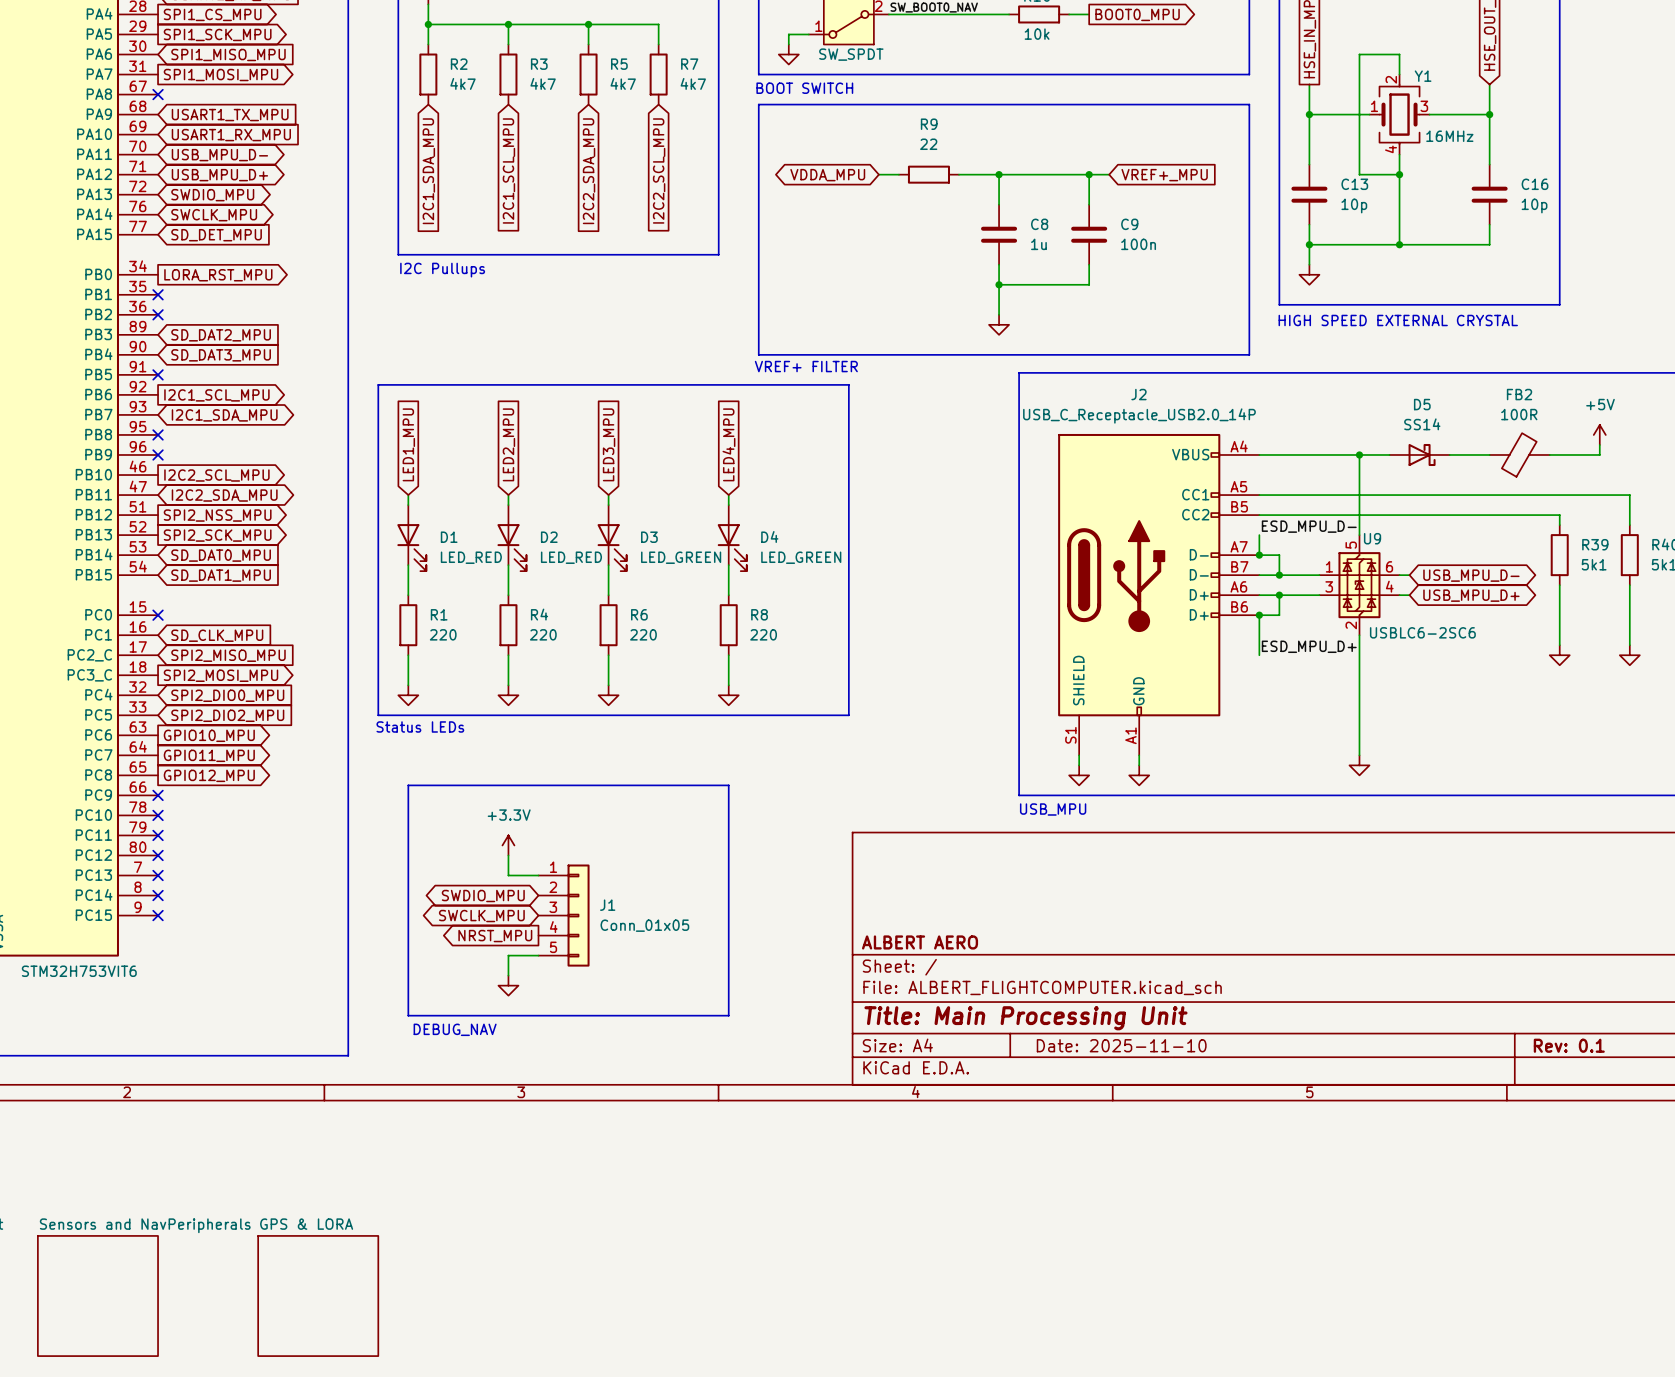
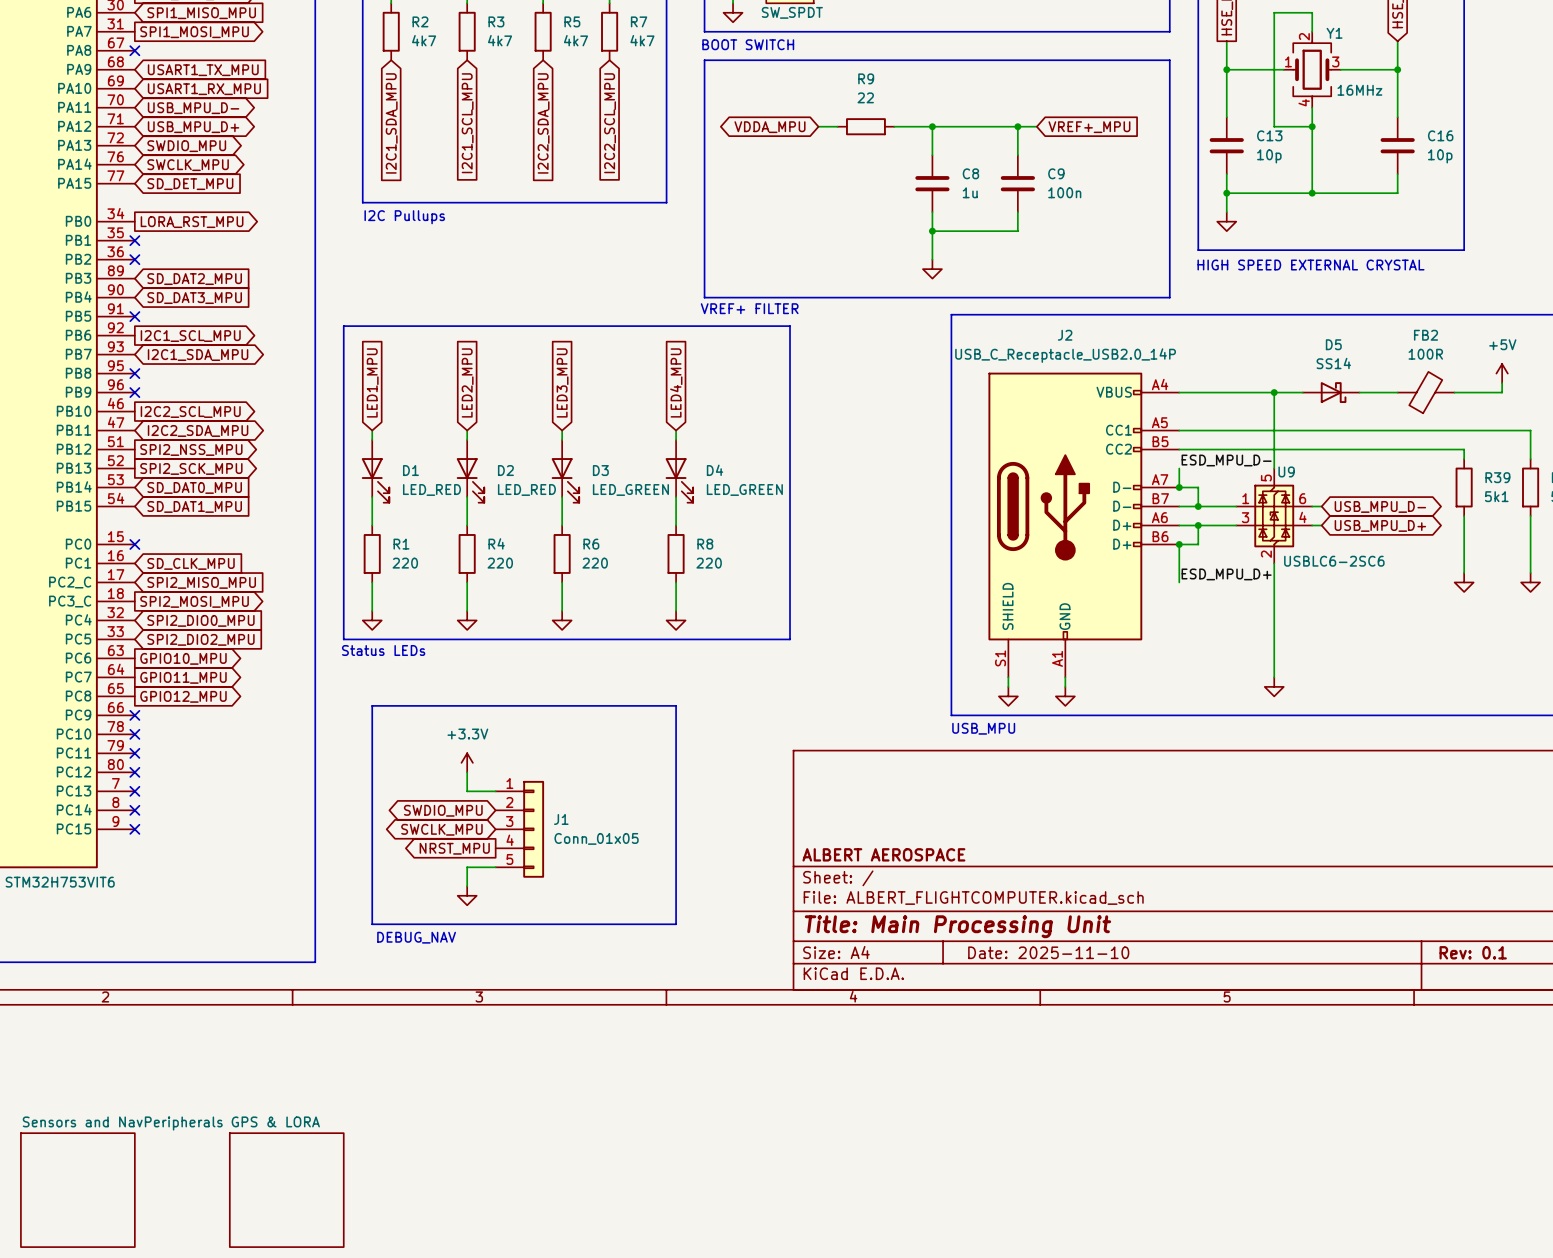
title block: ALBERT AERO (920, 942) -> ALBERT AEROSPACE (883, 854)

